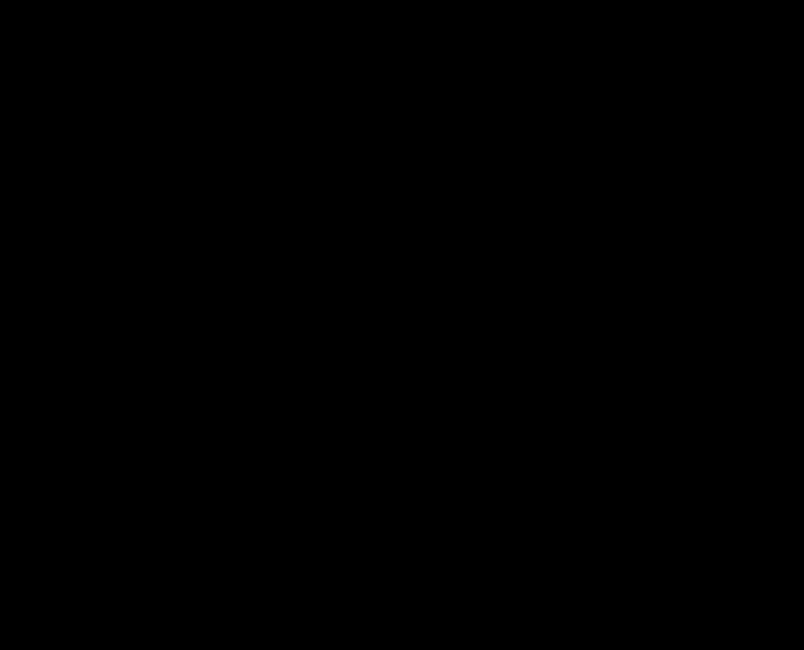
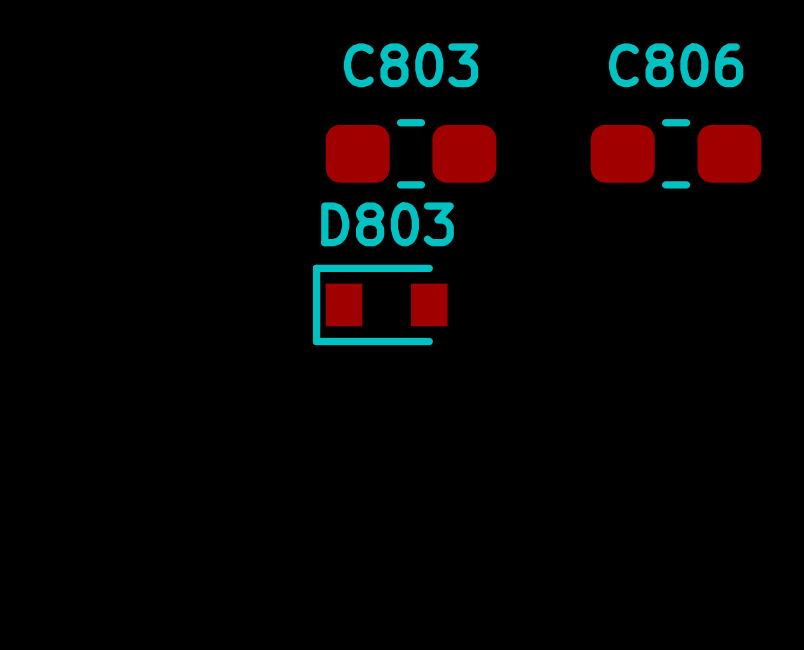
C803: none -> (411, 153)
C806: none -> (676, 153)
D803: none -> (380, 304)

